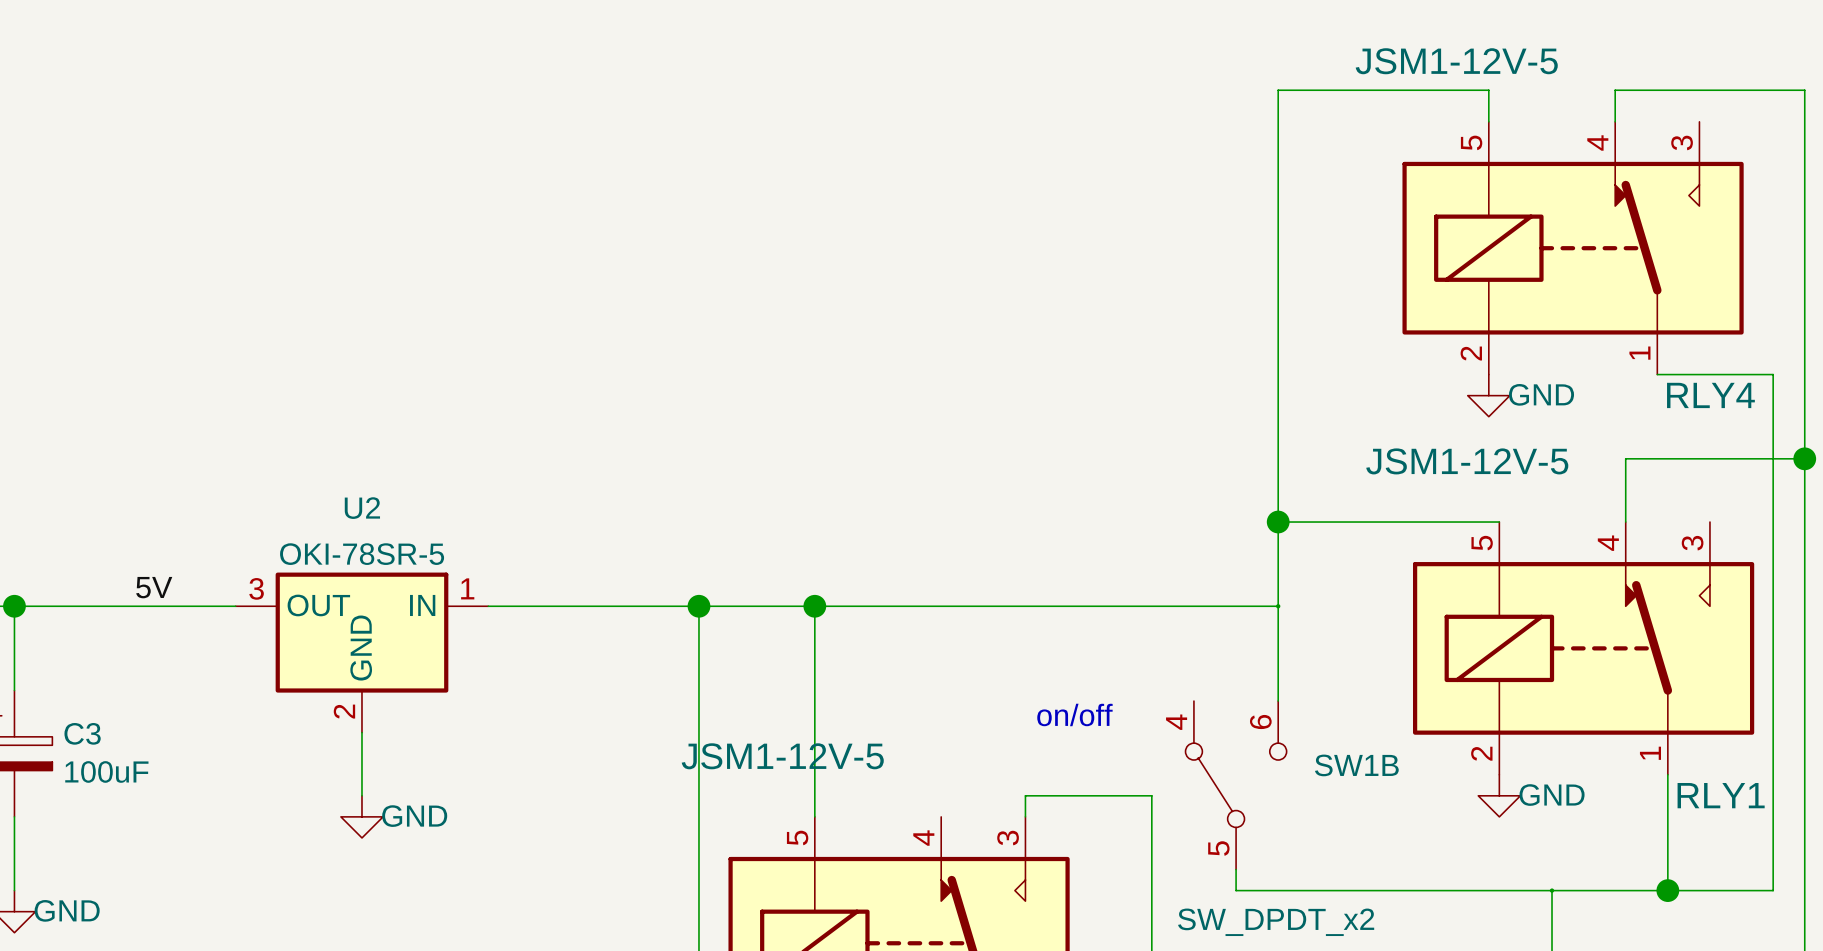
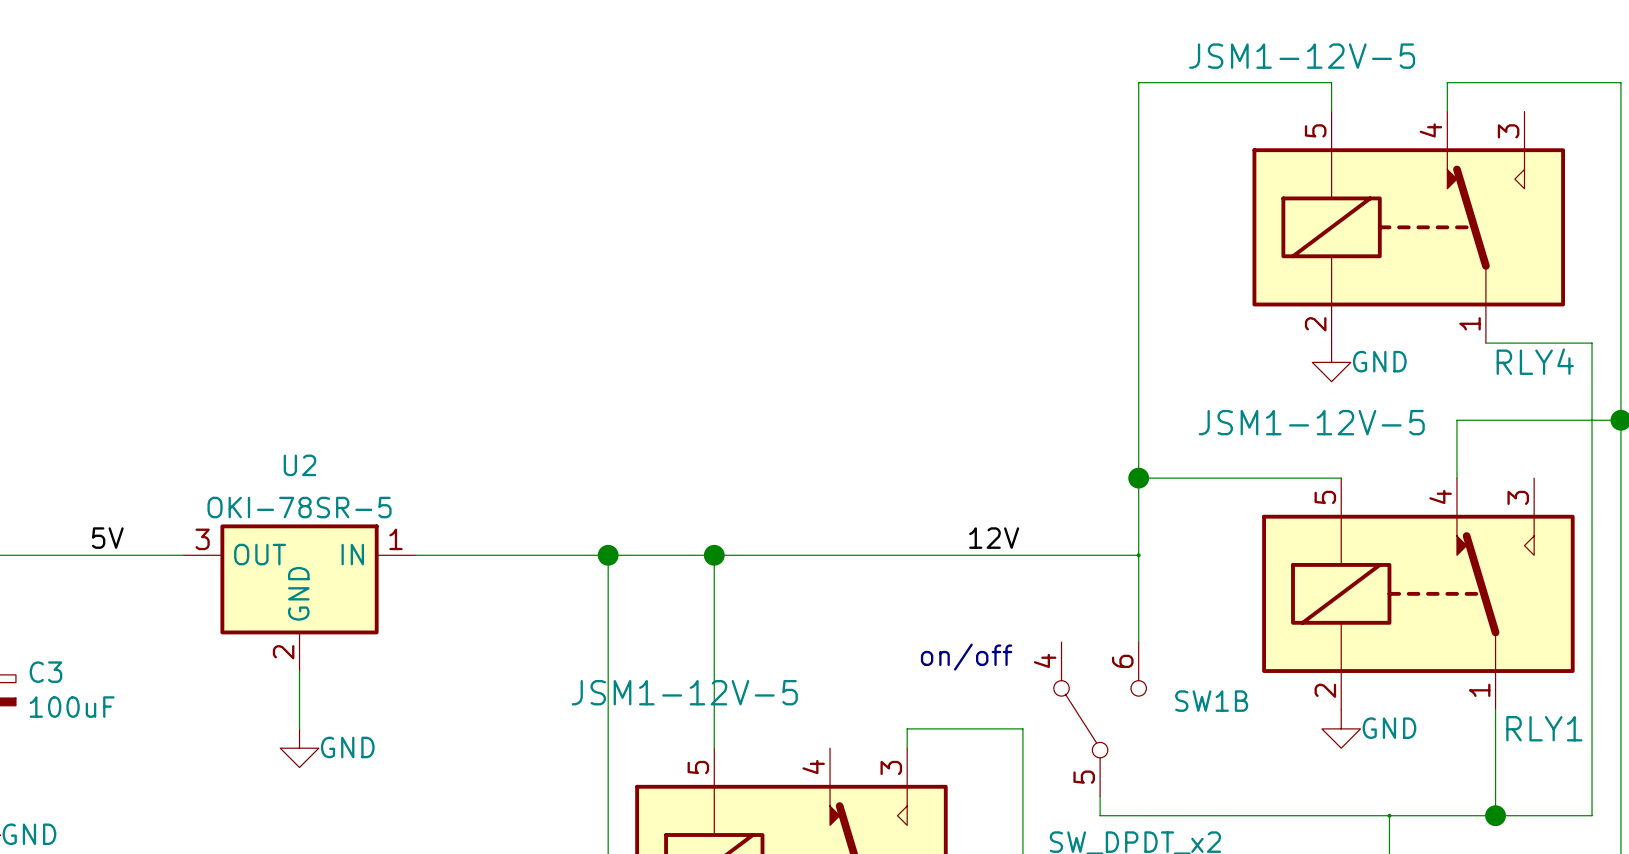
label: none -> 12V (994, 538)

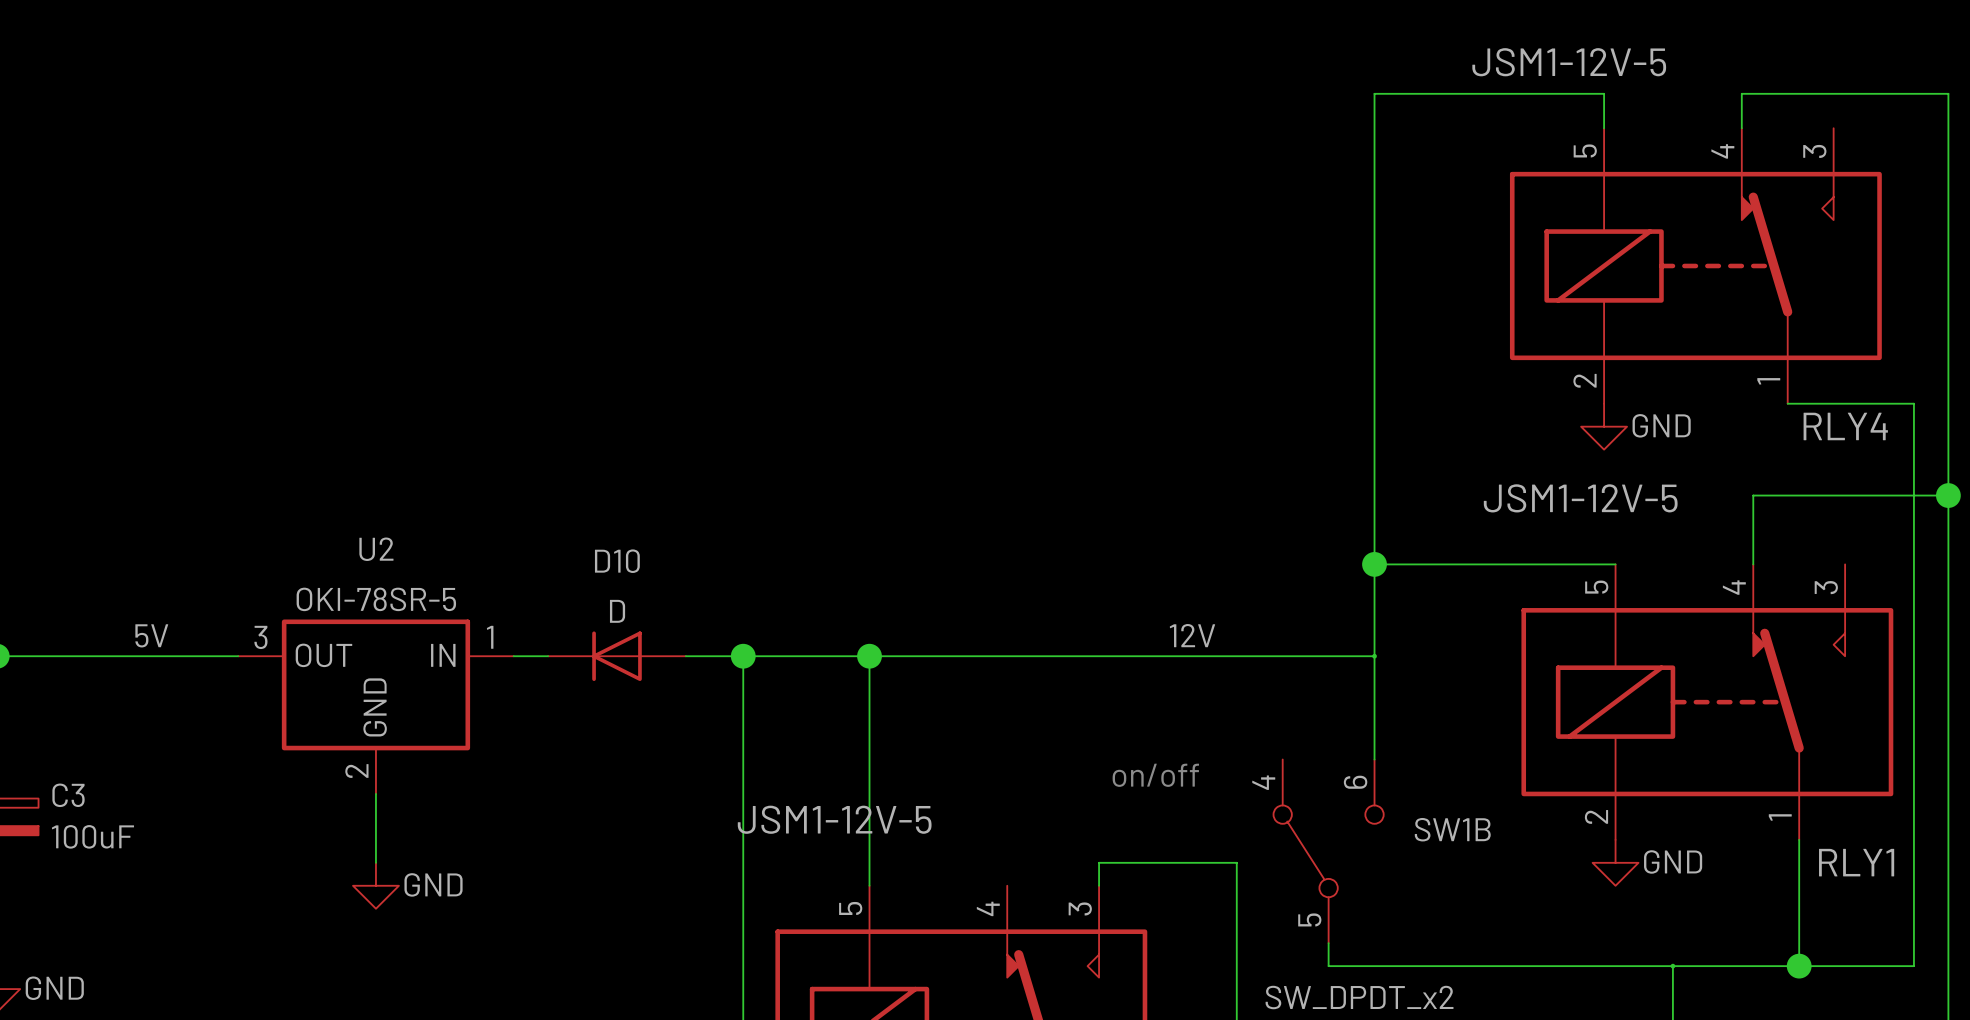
D10: none -> D (617, 656)

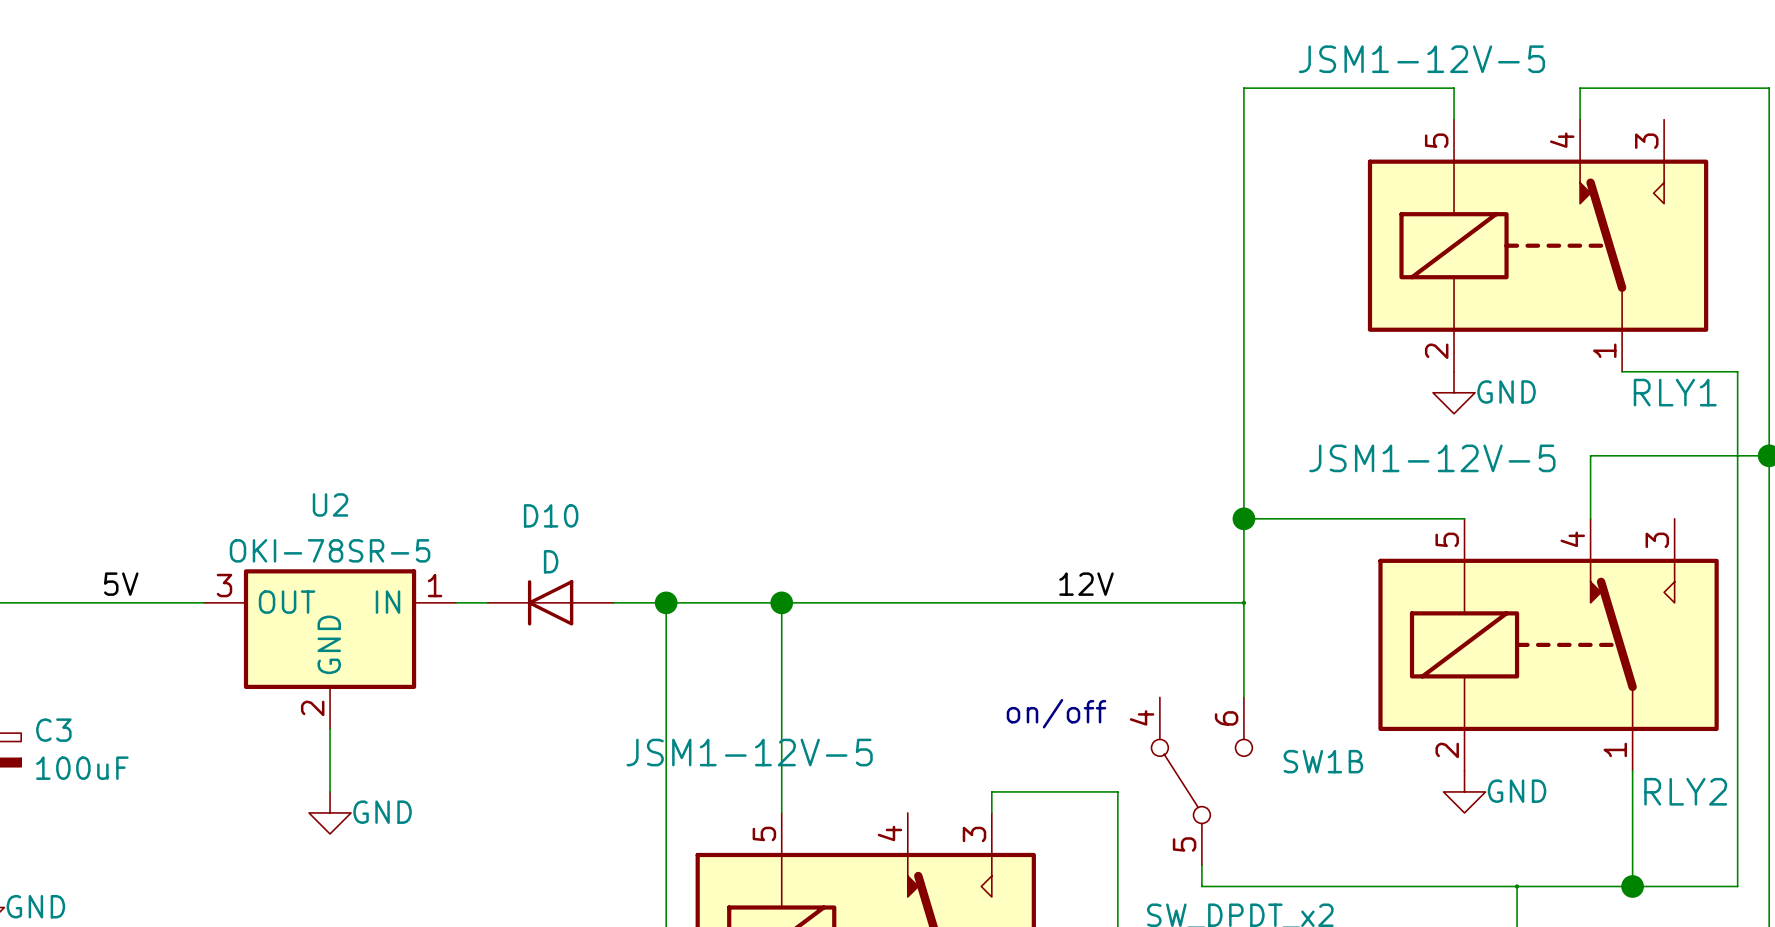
RLY4 name: RLY4 (1845, 426) -> RLY1 (1675, 392)
RLY1 name: RLY1 (1856, 862) -> RLY2 (1685, 791)

